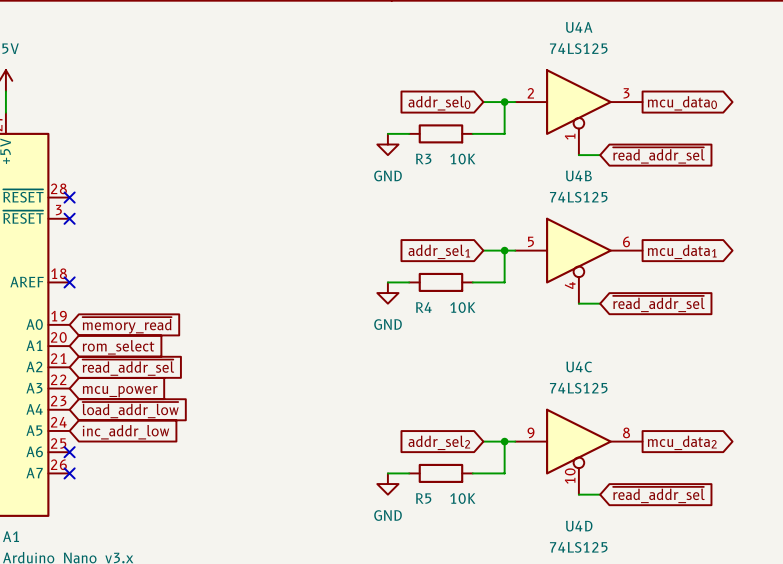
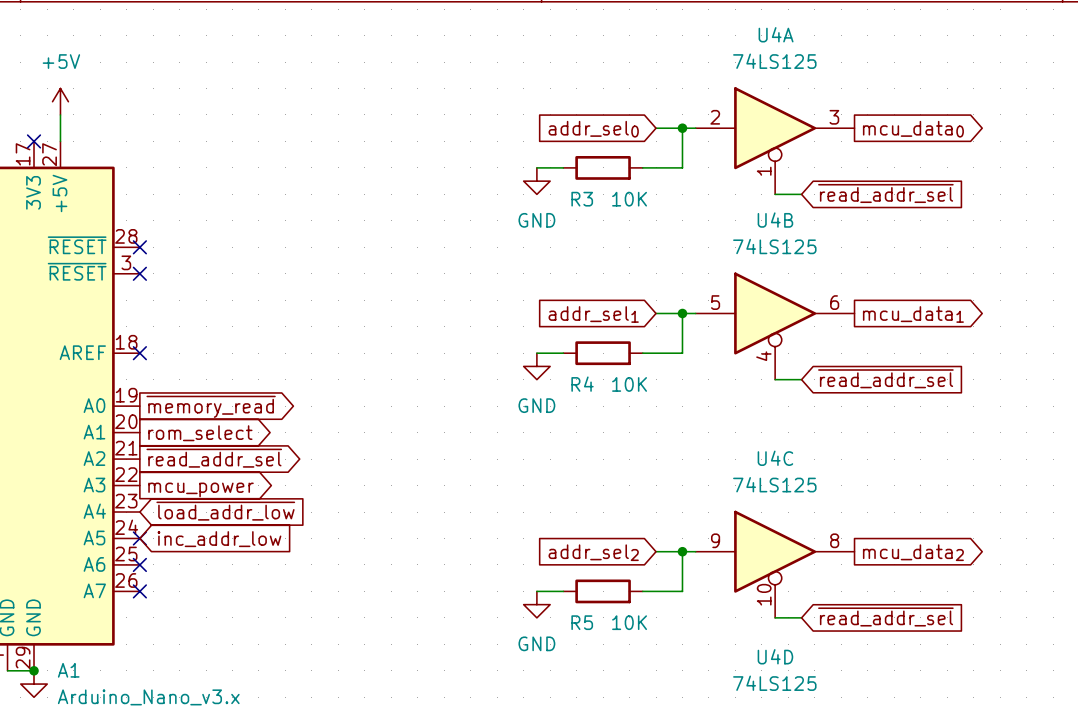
global label shape: input (127, 325) -> output (211, 406)
global label shape: input (118, 347) -> output (200, 433)
global label shape: input (128, 367) -> output (214, 458)
global label shape: input (120, 391) -> output (201, 489)
no-connect mark: none -> (139, 538)

